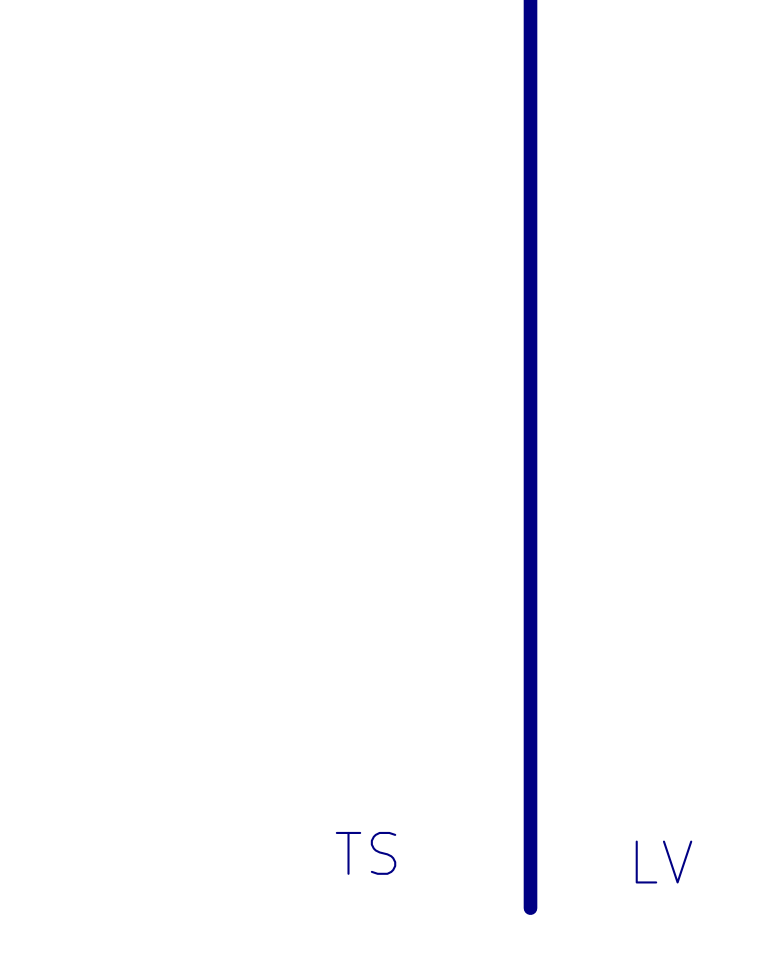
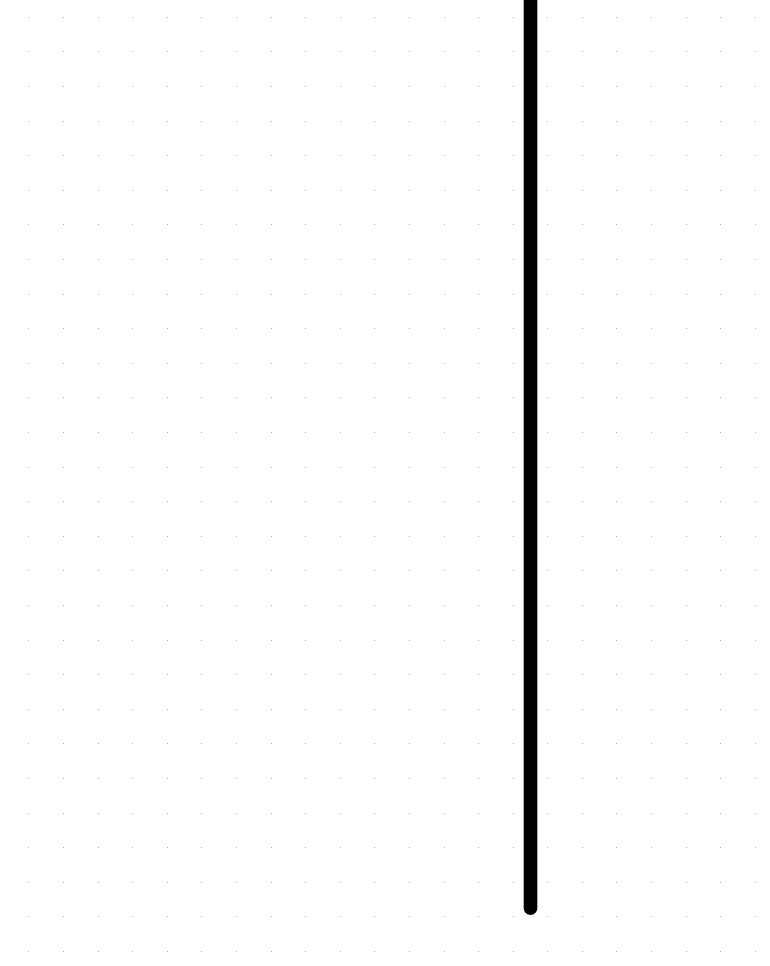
text: TS (366, 853) -> none
text: LV (663, 862) -> none

